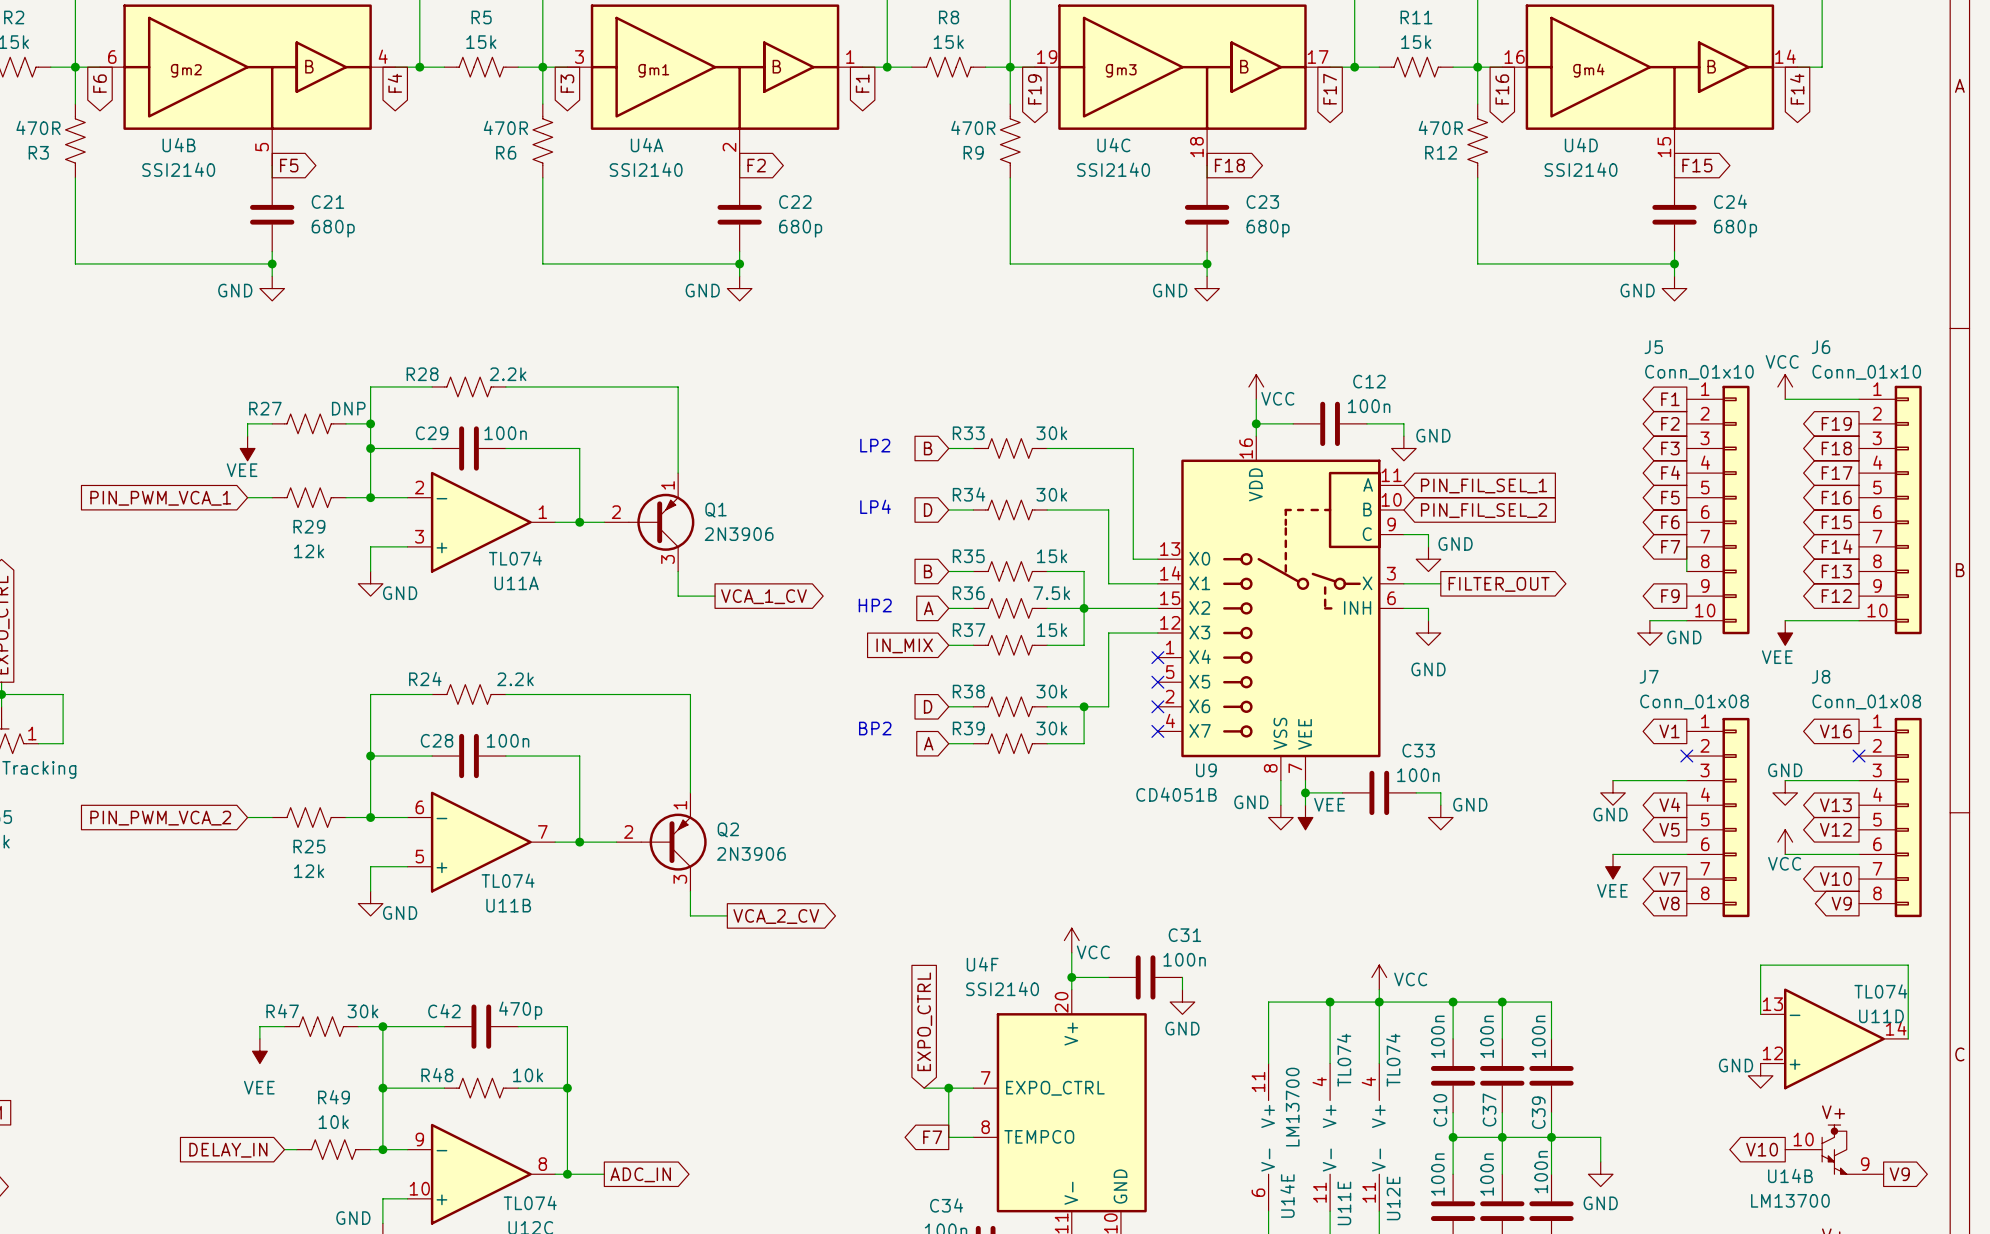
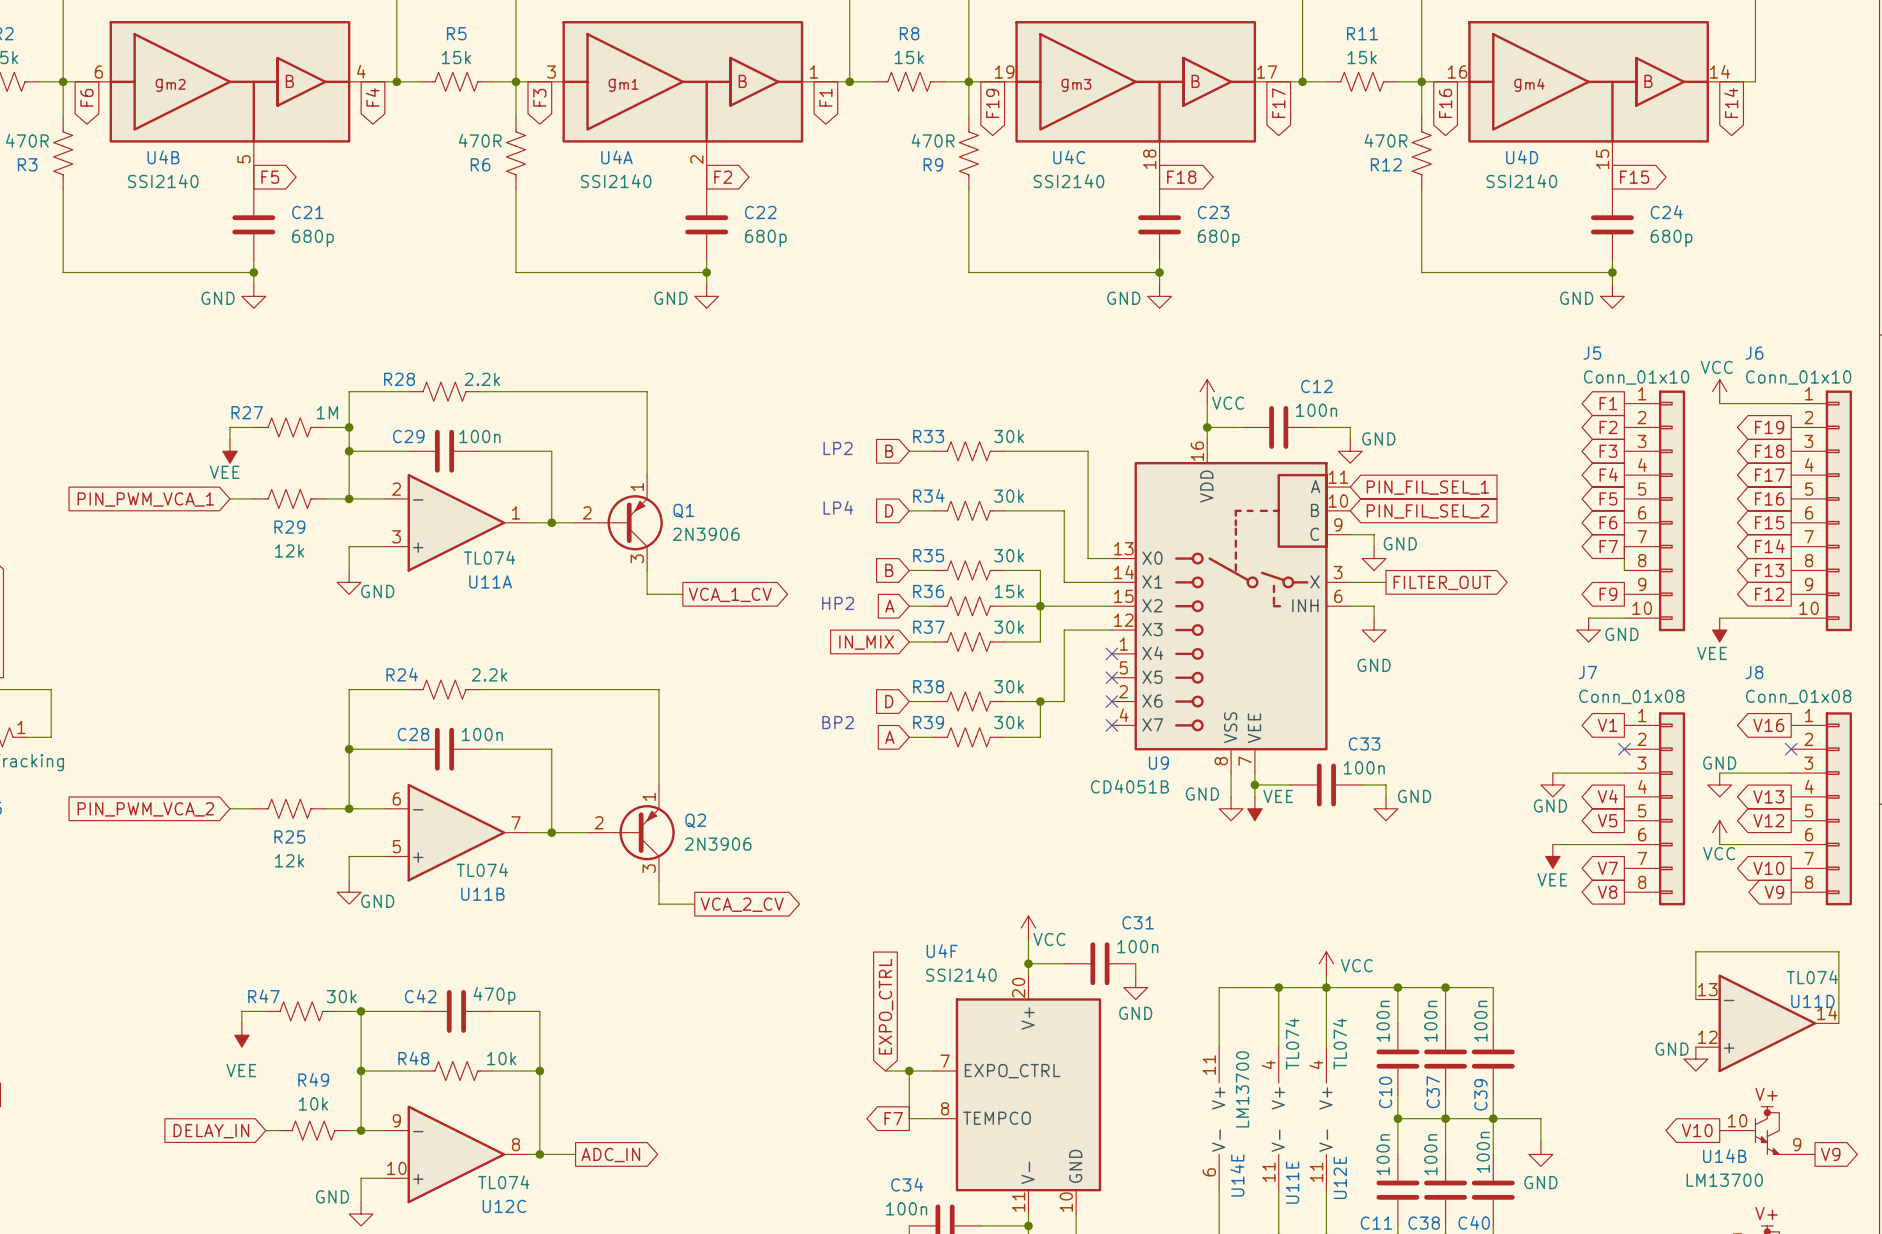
R27 value: DNP (348, 408) -> 1M (327, 412)
R35 value: 15k (1052, 556) -> 30k (1009, 555)
R36 value: 7.5k (1051, 593) -> 15k (1009, 591)
R37 value: 15k (1052, 630) -> 30k (1009, 627)

